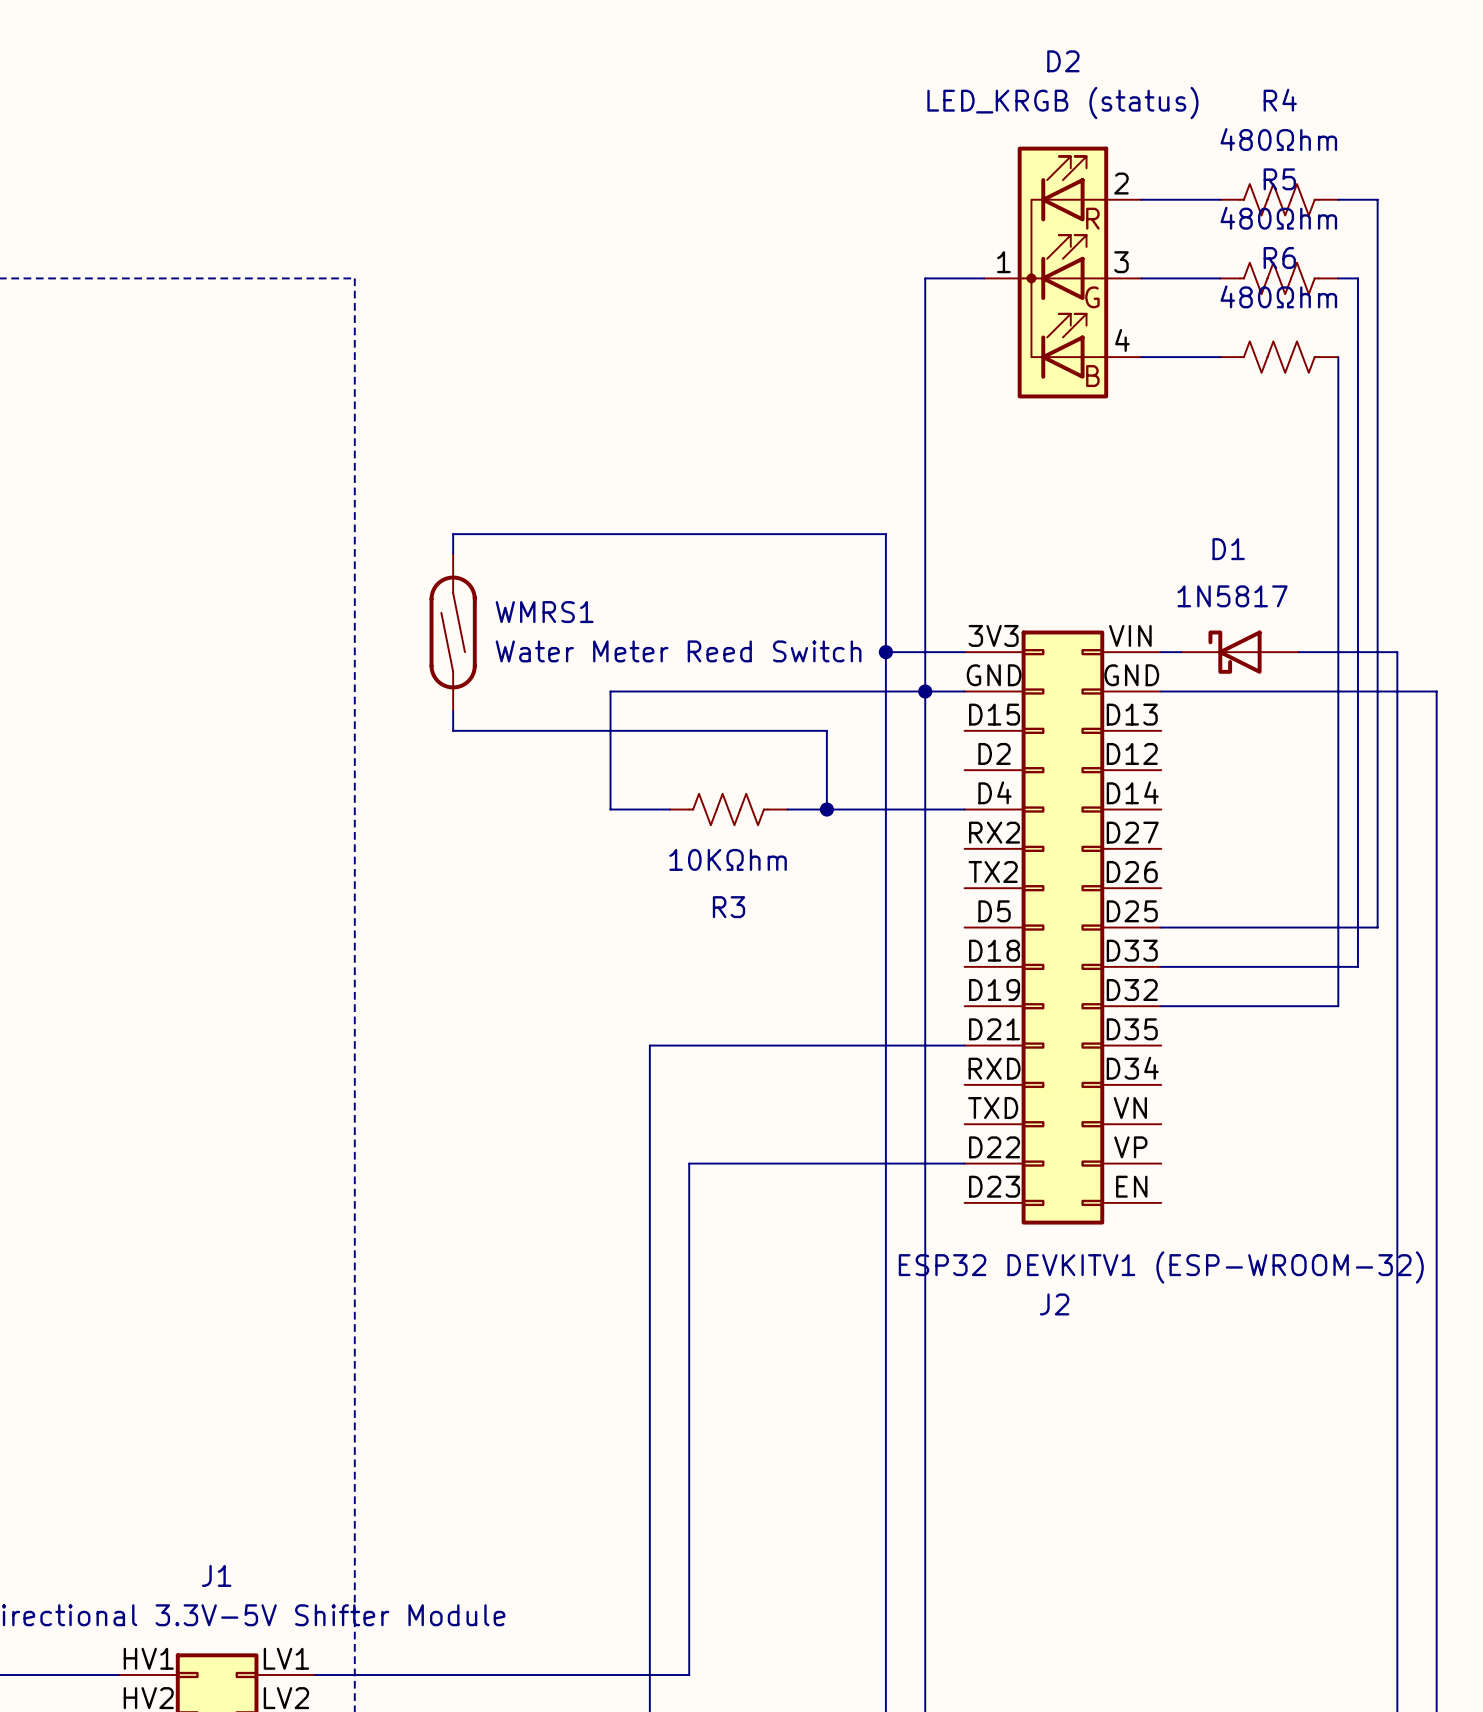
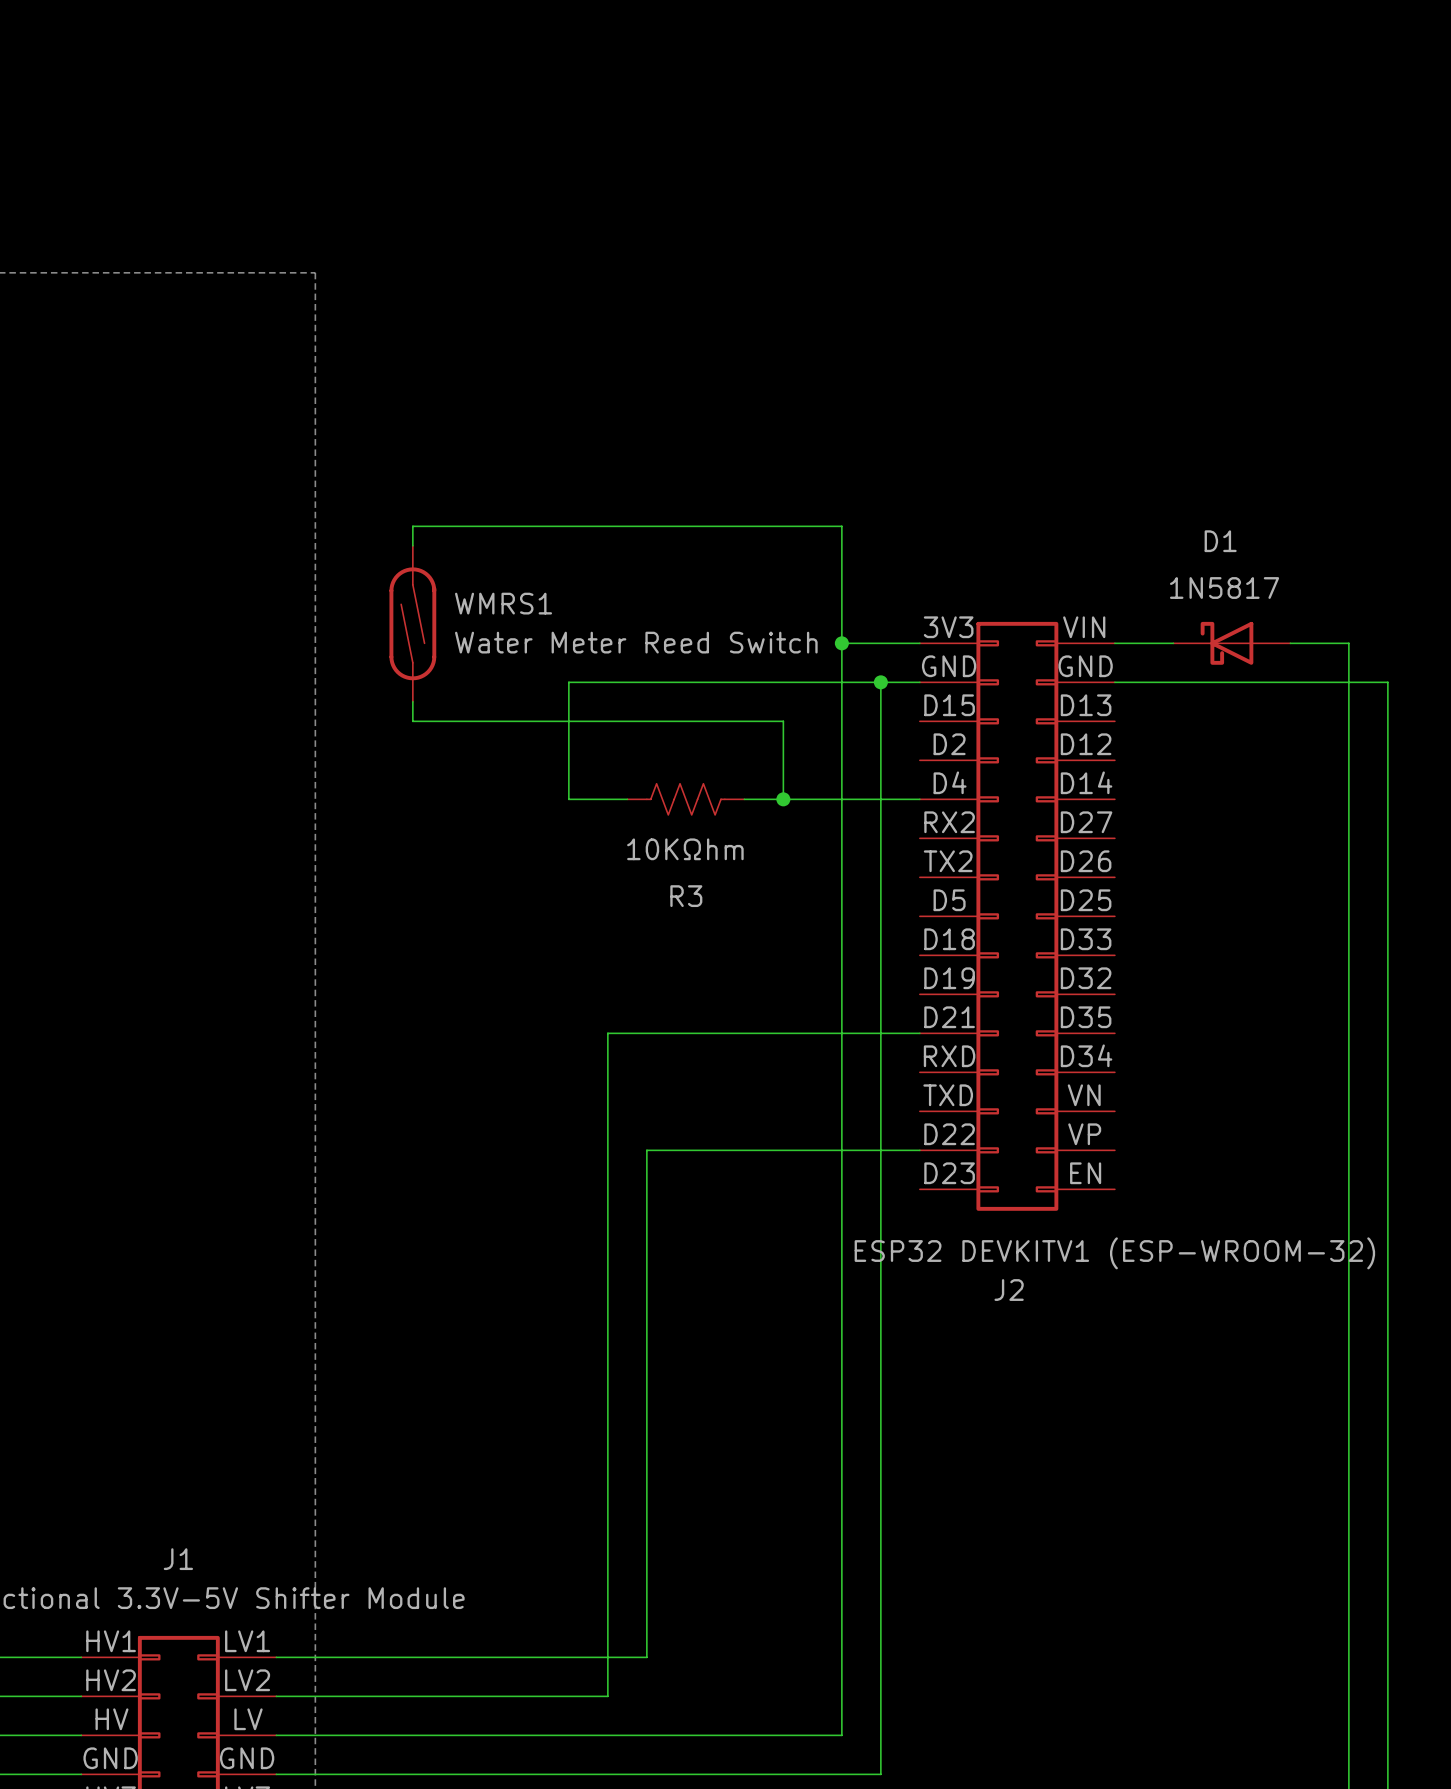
wire: (1141, 199) (1220, 199) -> none
R4: 480Ωhm (1279, 199) -> none
wire: (1338, 199) (1377, 199) (1377, 927) (1161, 927) -> none
D2: LED_KRGB (status) (1062, 272) -> none
wire: (984, 278) (925, 278) (925, 691) -> none
wire: (1141, 278) (1220, 278) -> none
R5: 480Ωhm (1279, 278) -> none
wire: (1338, 278) (1357, 278) (1357, 966) (1161, 966) -> none
wire: (1141, 357) (1220, 357) -> none
R6: 480Ωhm (1279, 357) -> none
wire: (1338, 357) (1338, 1006) (1161, 1006) -> none
D1 position: (1239, 652) -> (1231, 643)

